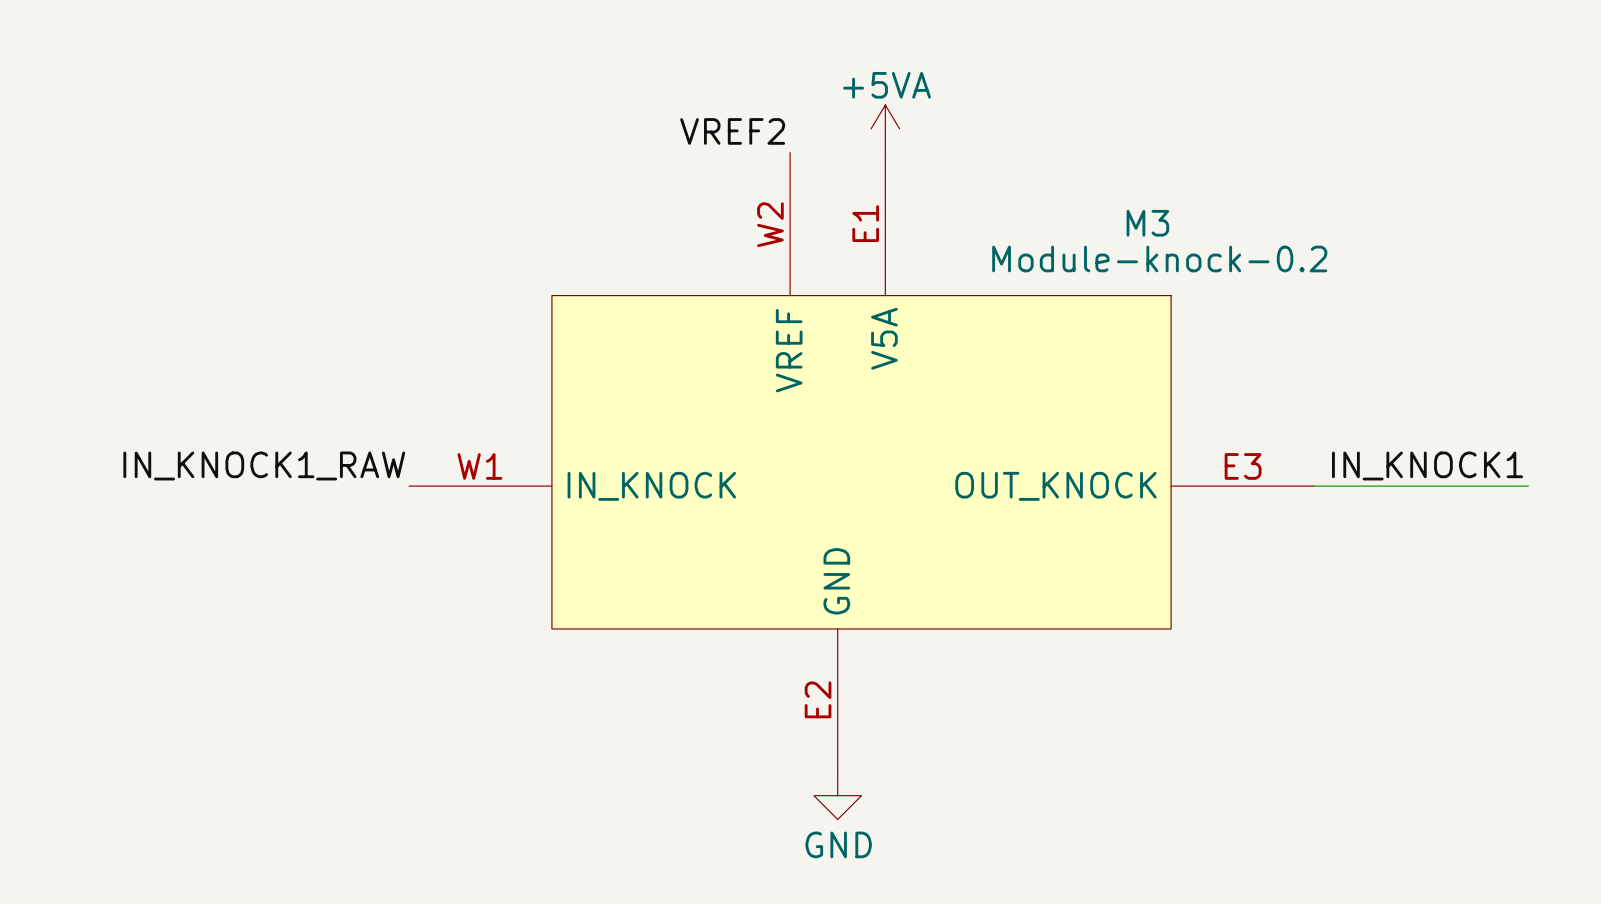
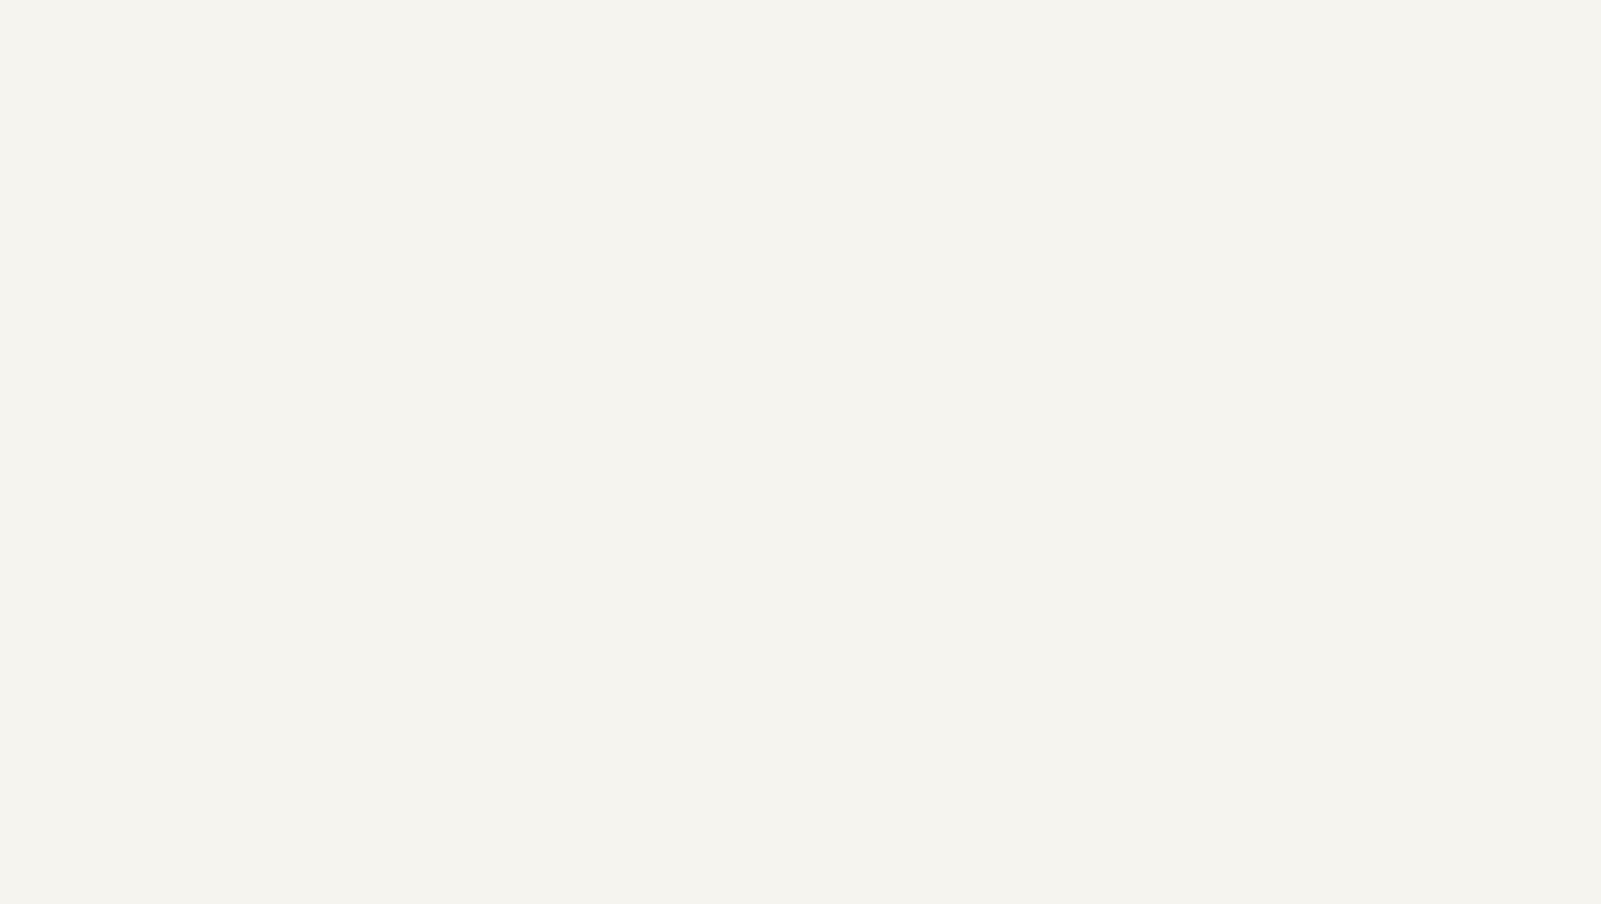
power symbol: +5VA (885, 128) -> none
label: VREF2 (732, 131) -> none
M3: Module-knock-0.2 (861, 462) -> none
label: IN_KNOCK1_RAW (264, 465) -> none
label: IN_KNOCK1 (1427, 465) -> none
wire: (1313, 486) (1528, 486) -> none
power symbol: GND (837, 795) -> none

